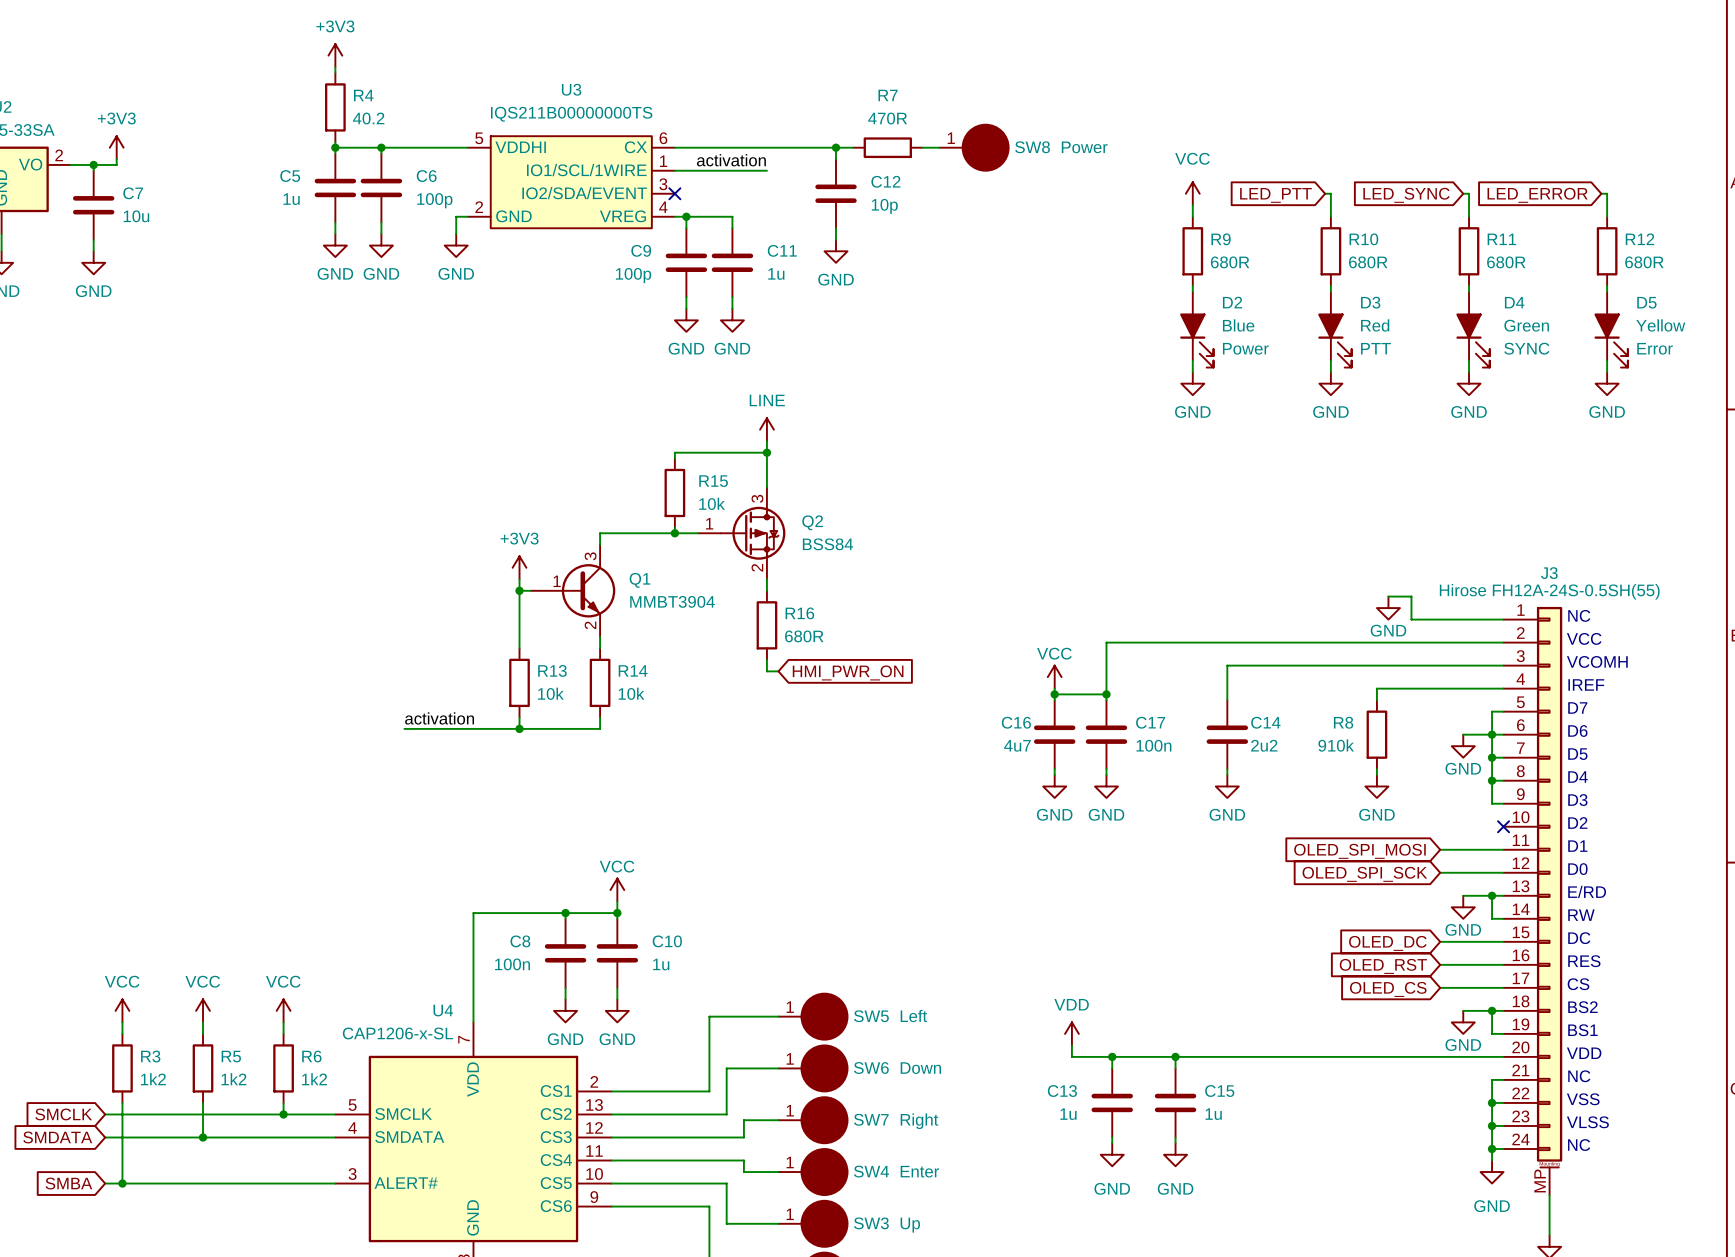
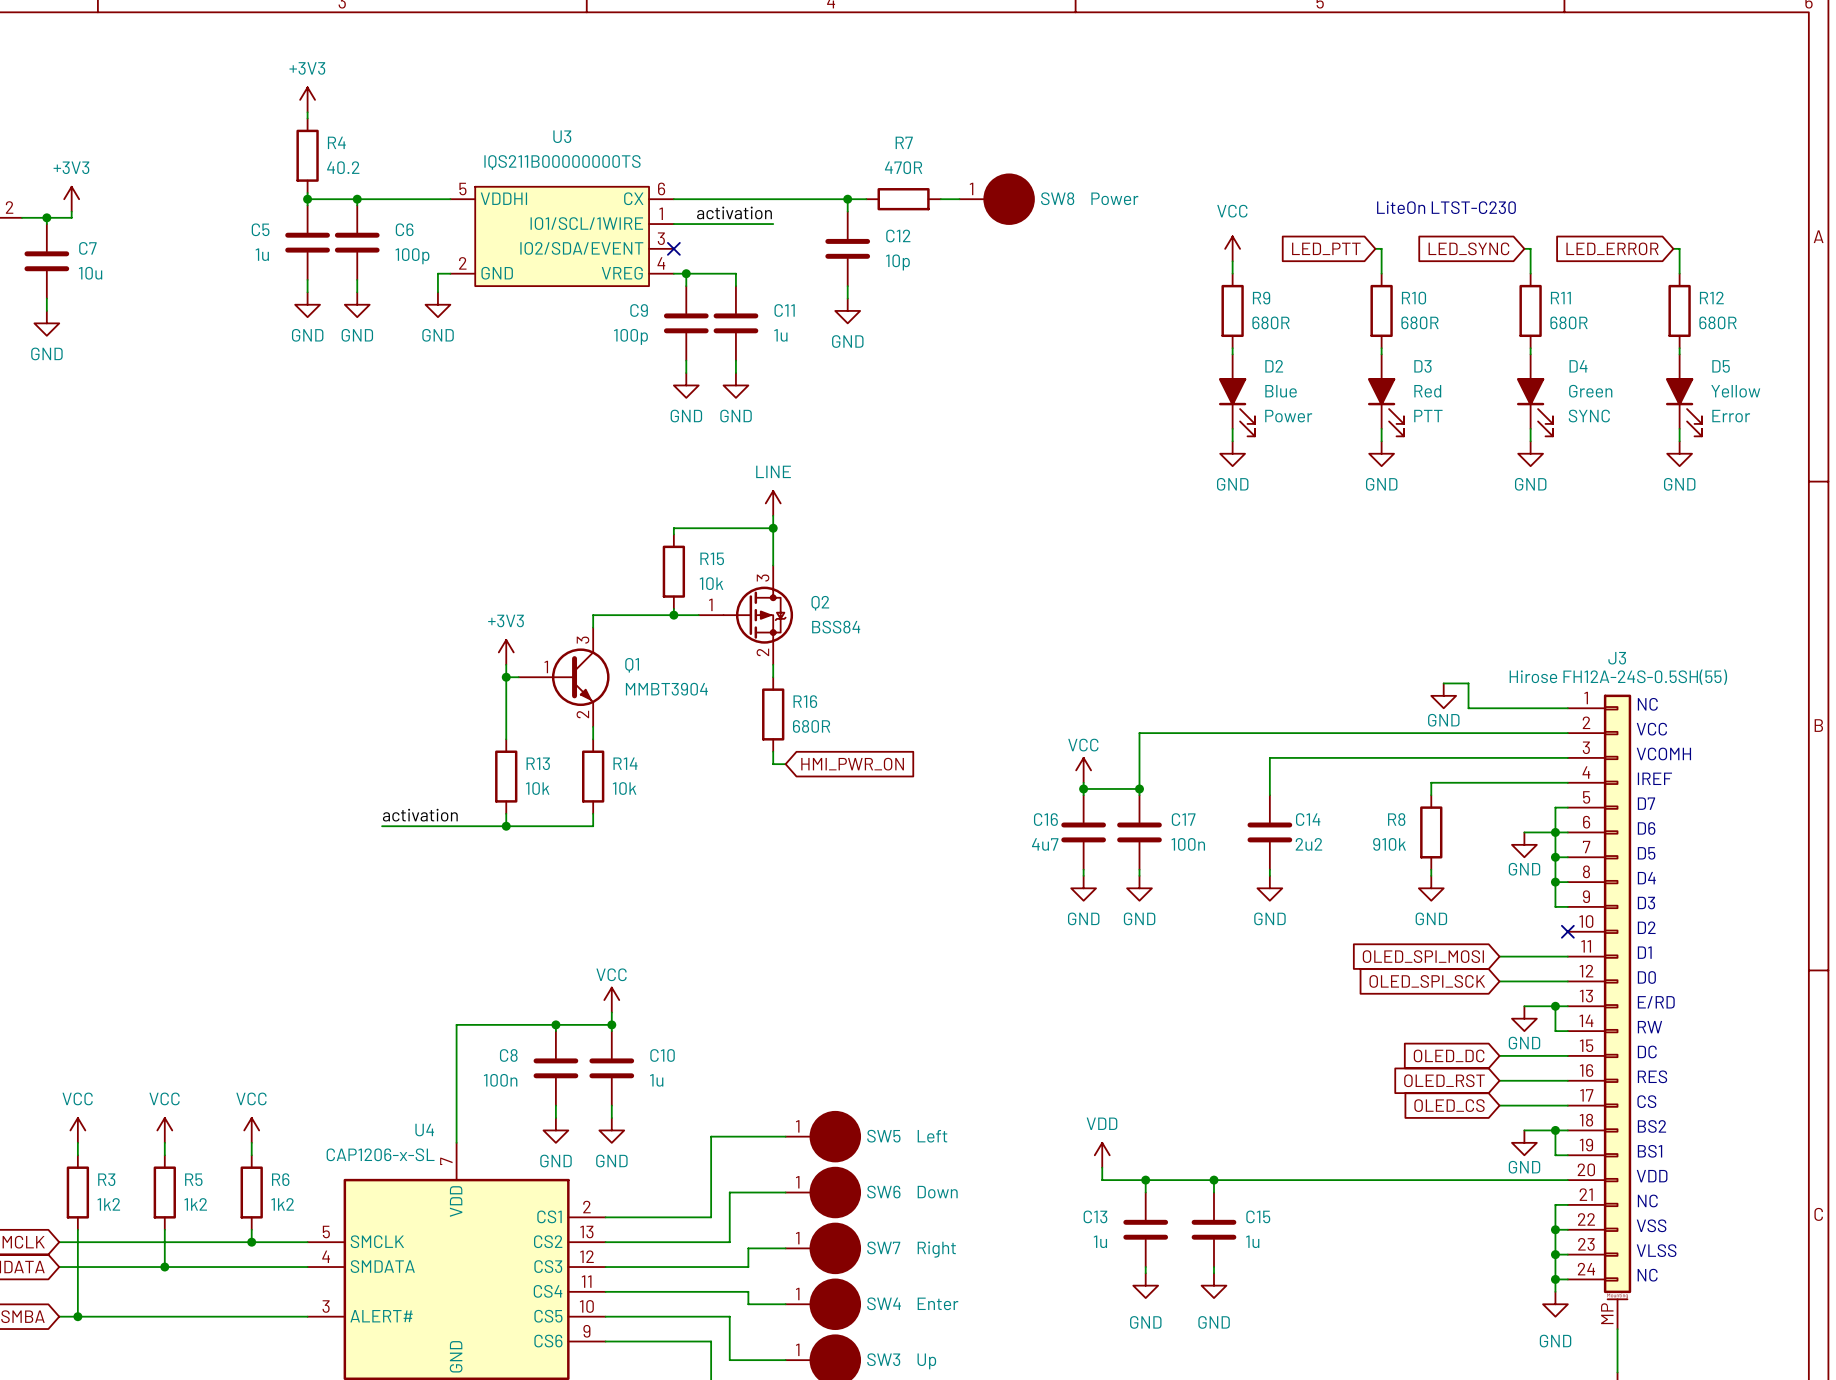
text: none -> LiteOn LTST-C230 (1446, 207)

